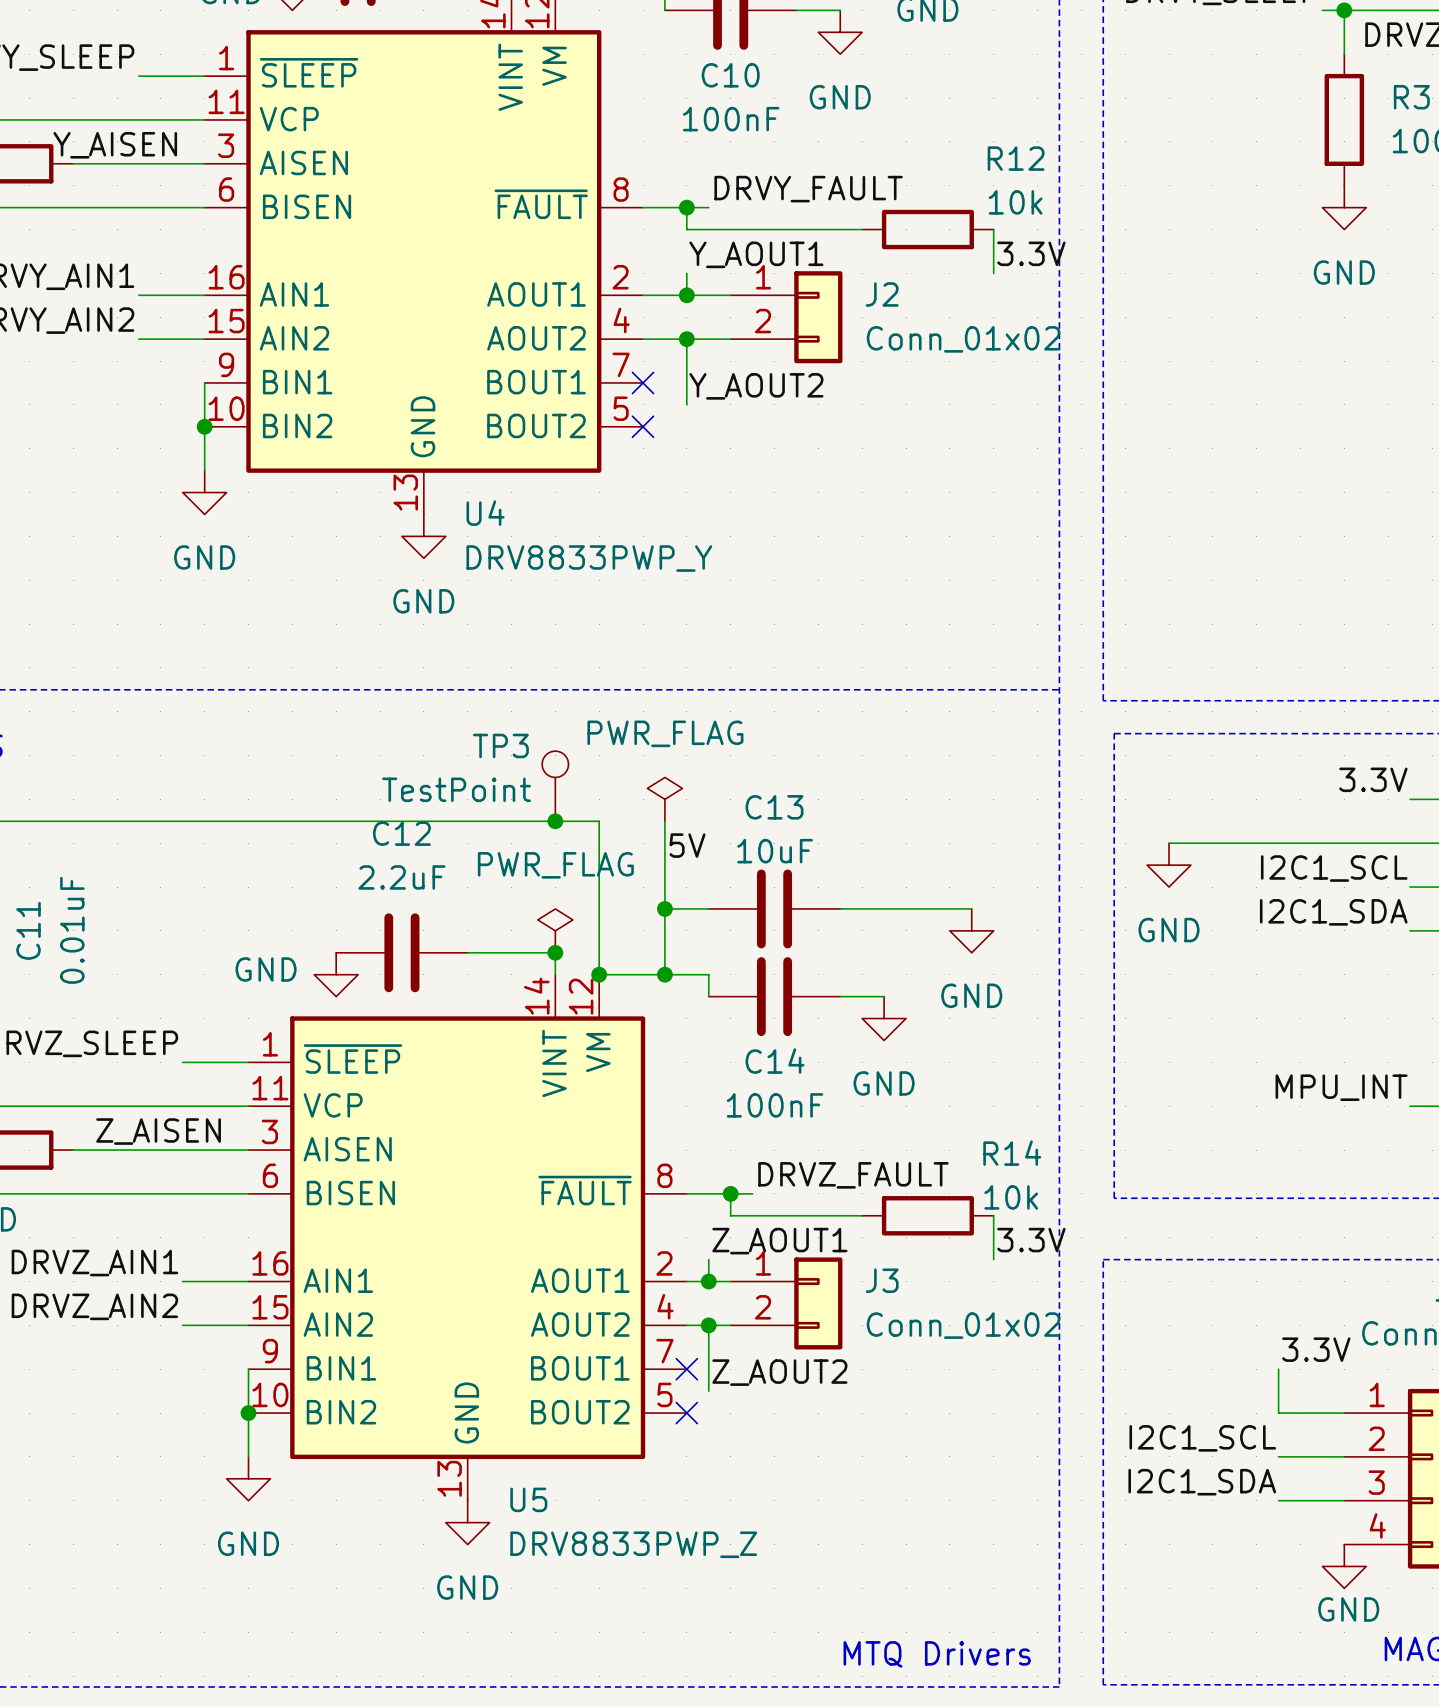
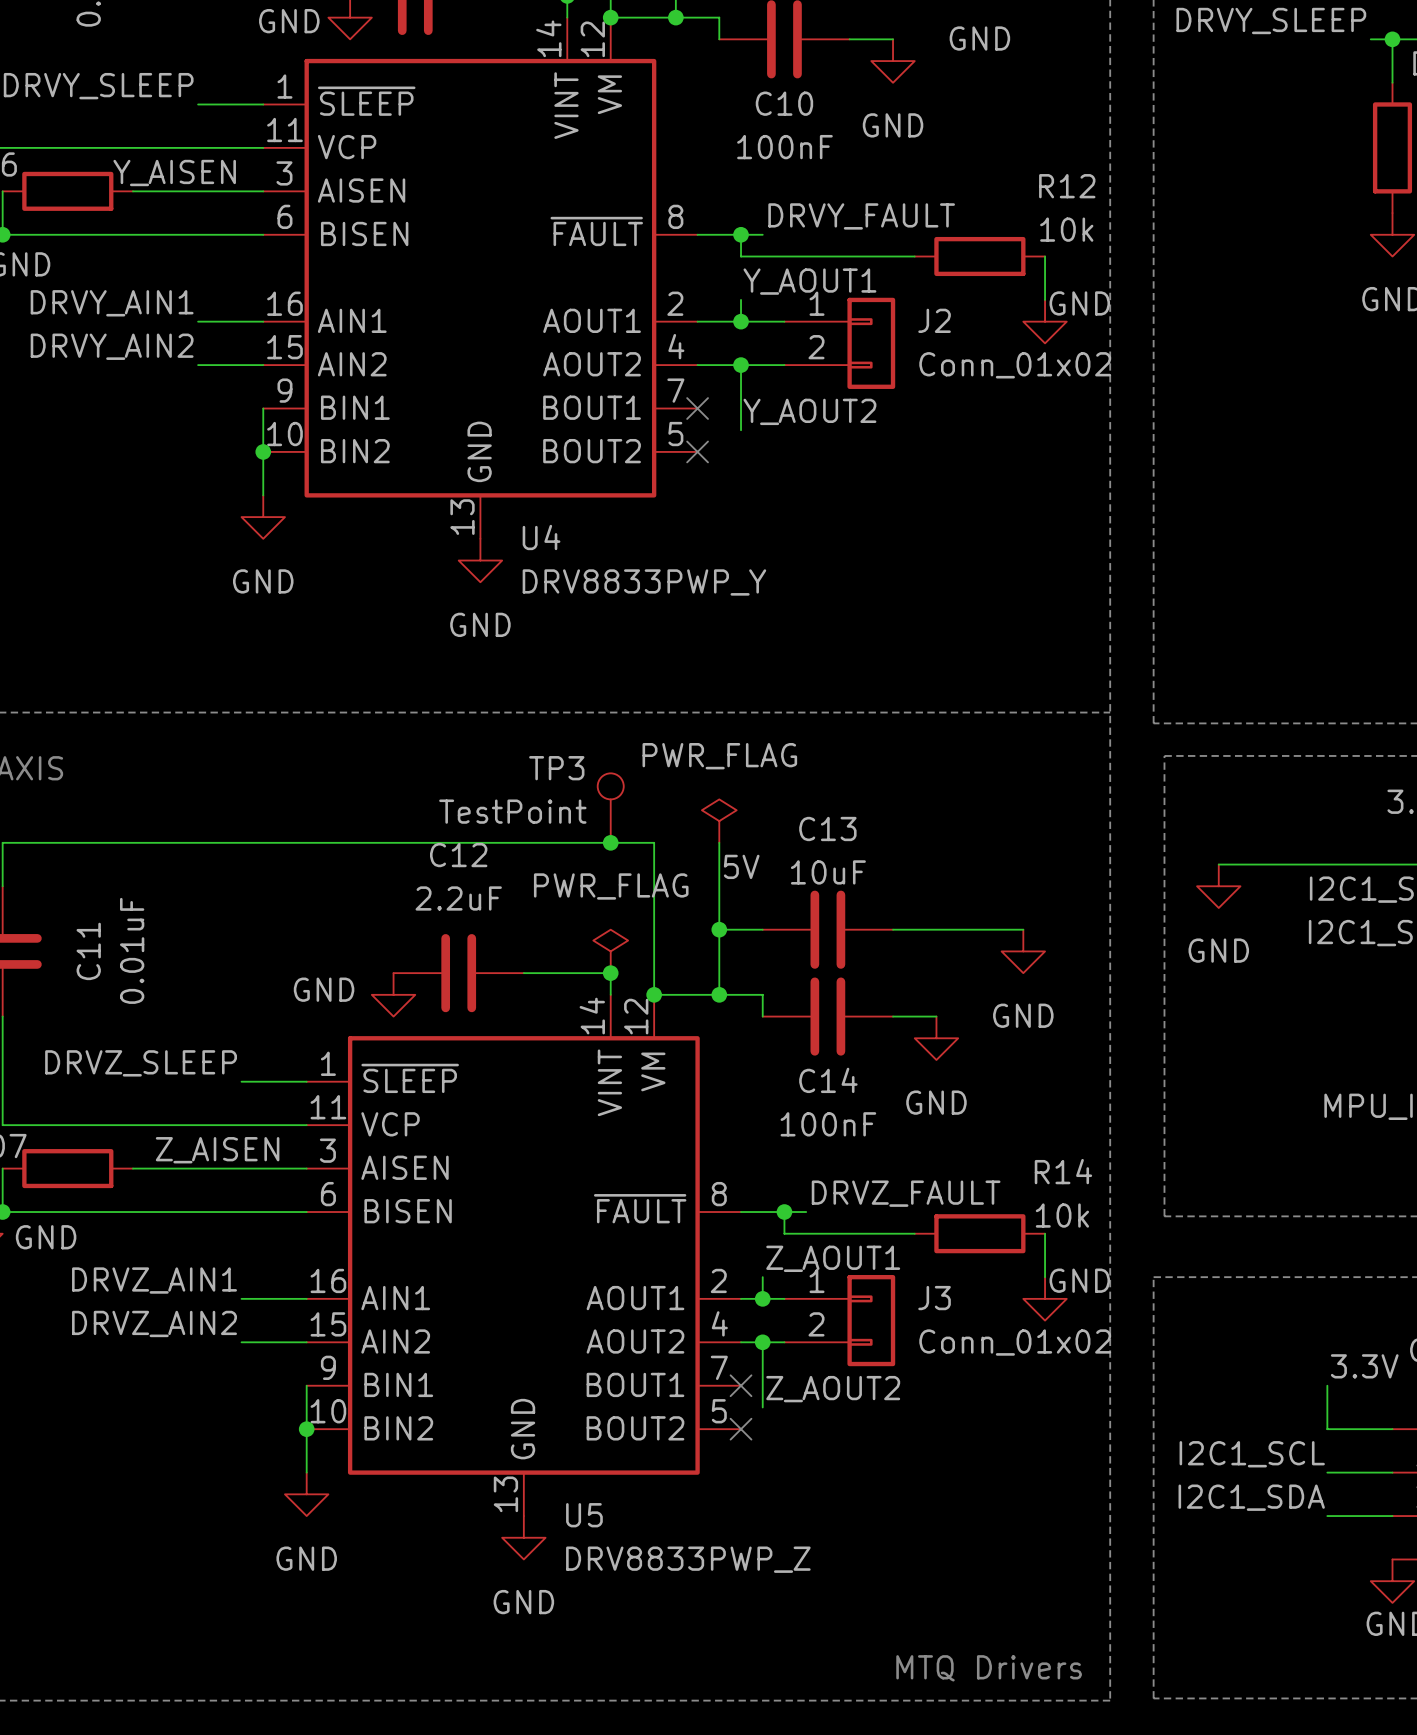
label: 3.3V (1031, 253) -> none
power symbol: none -> GND (1045, 321)
label: 3.3V (1031, 1240) -> none
power symbol: none -> GND (1045, 1298)

